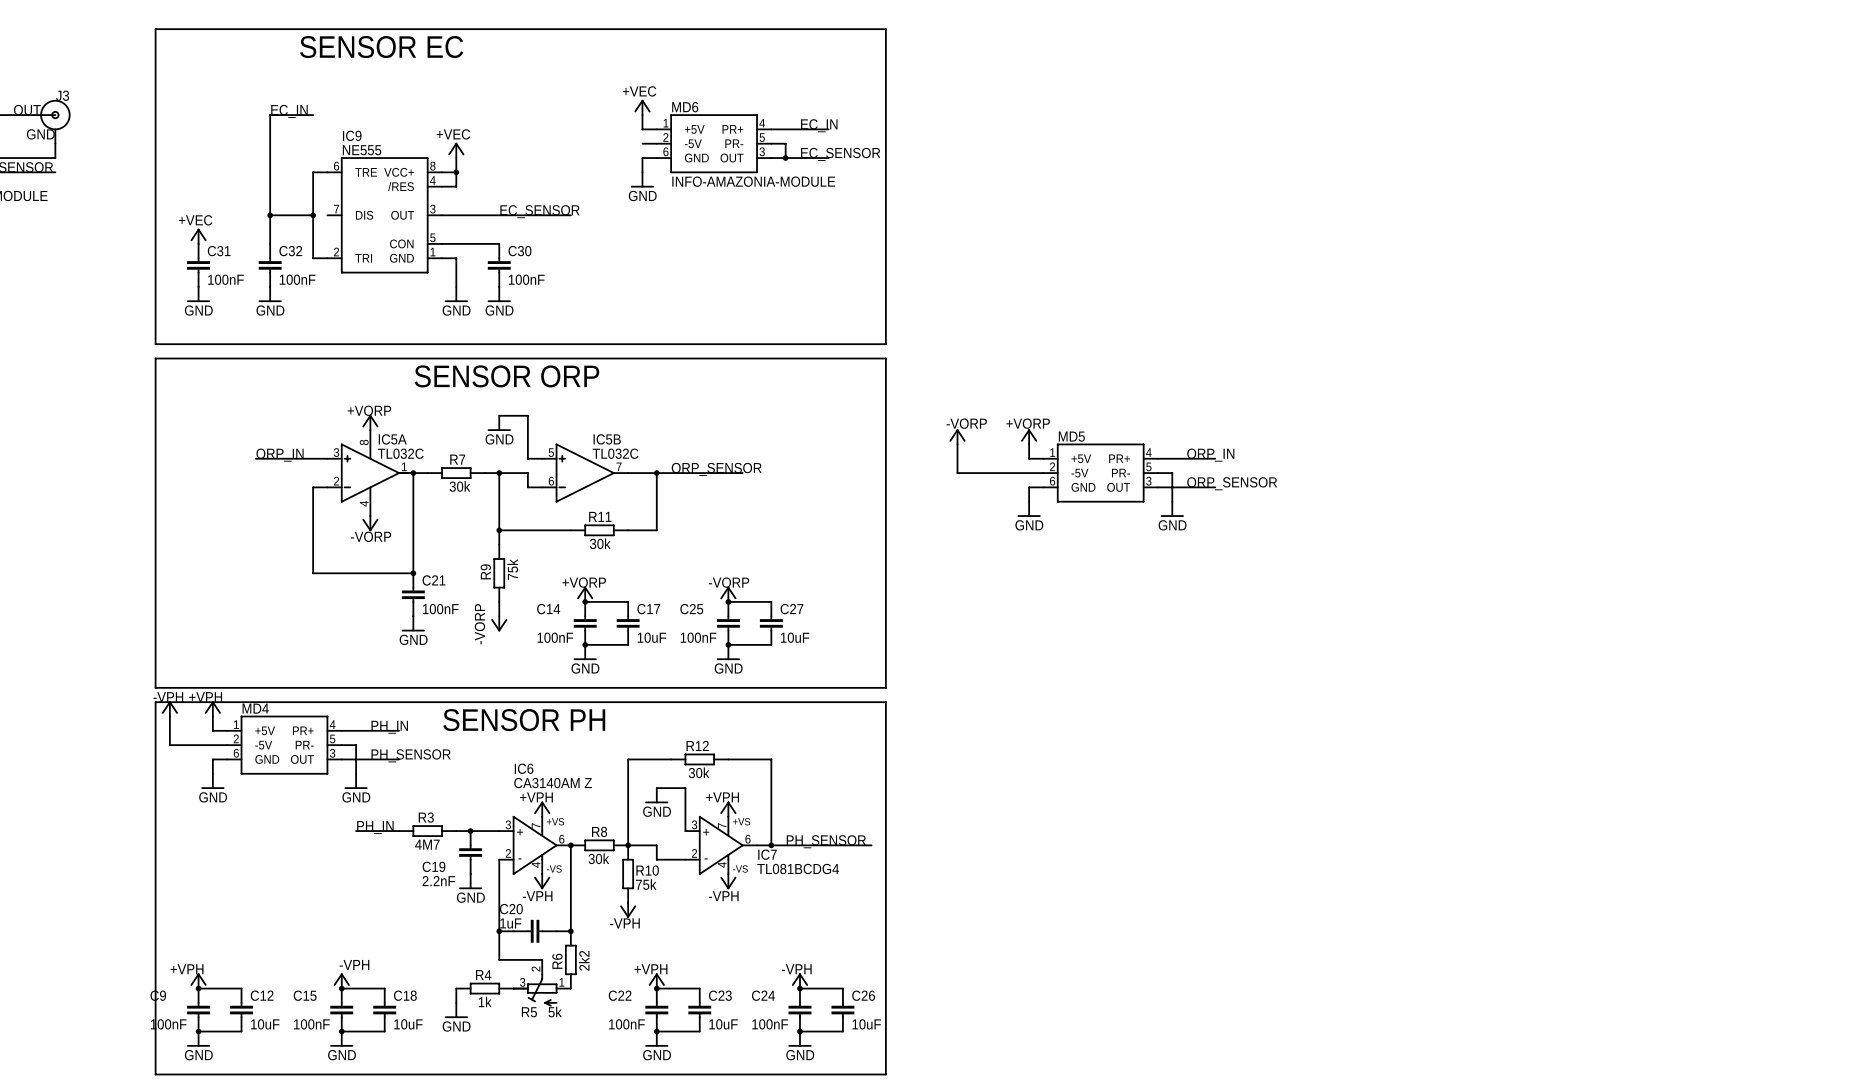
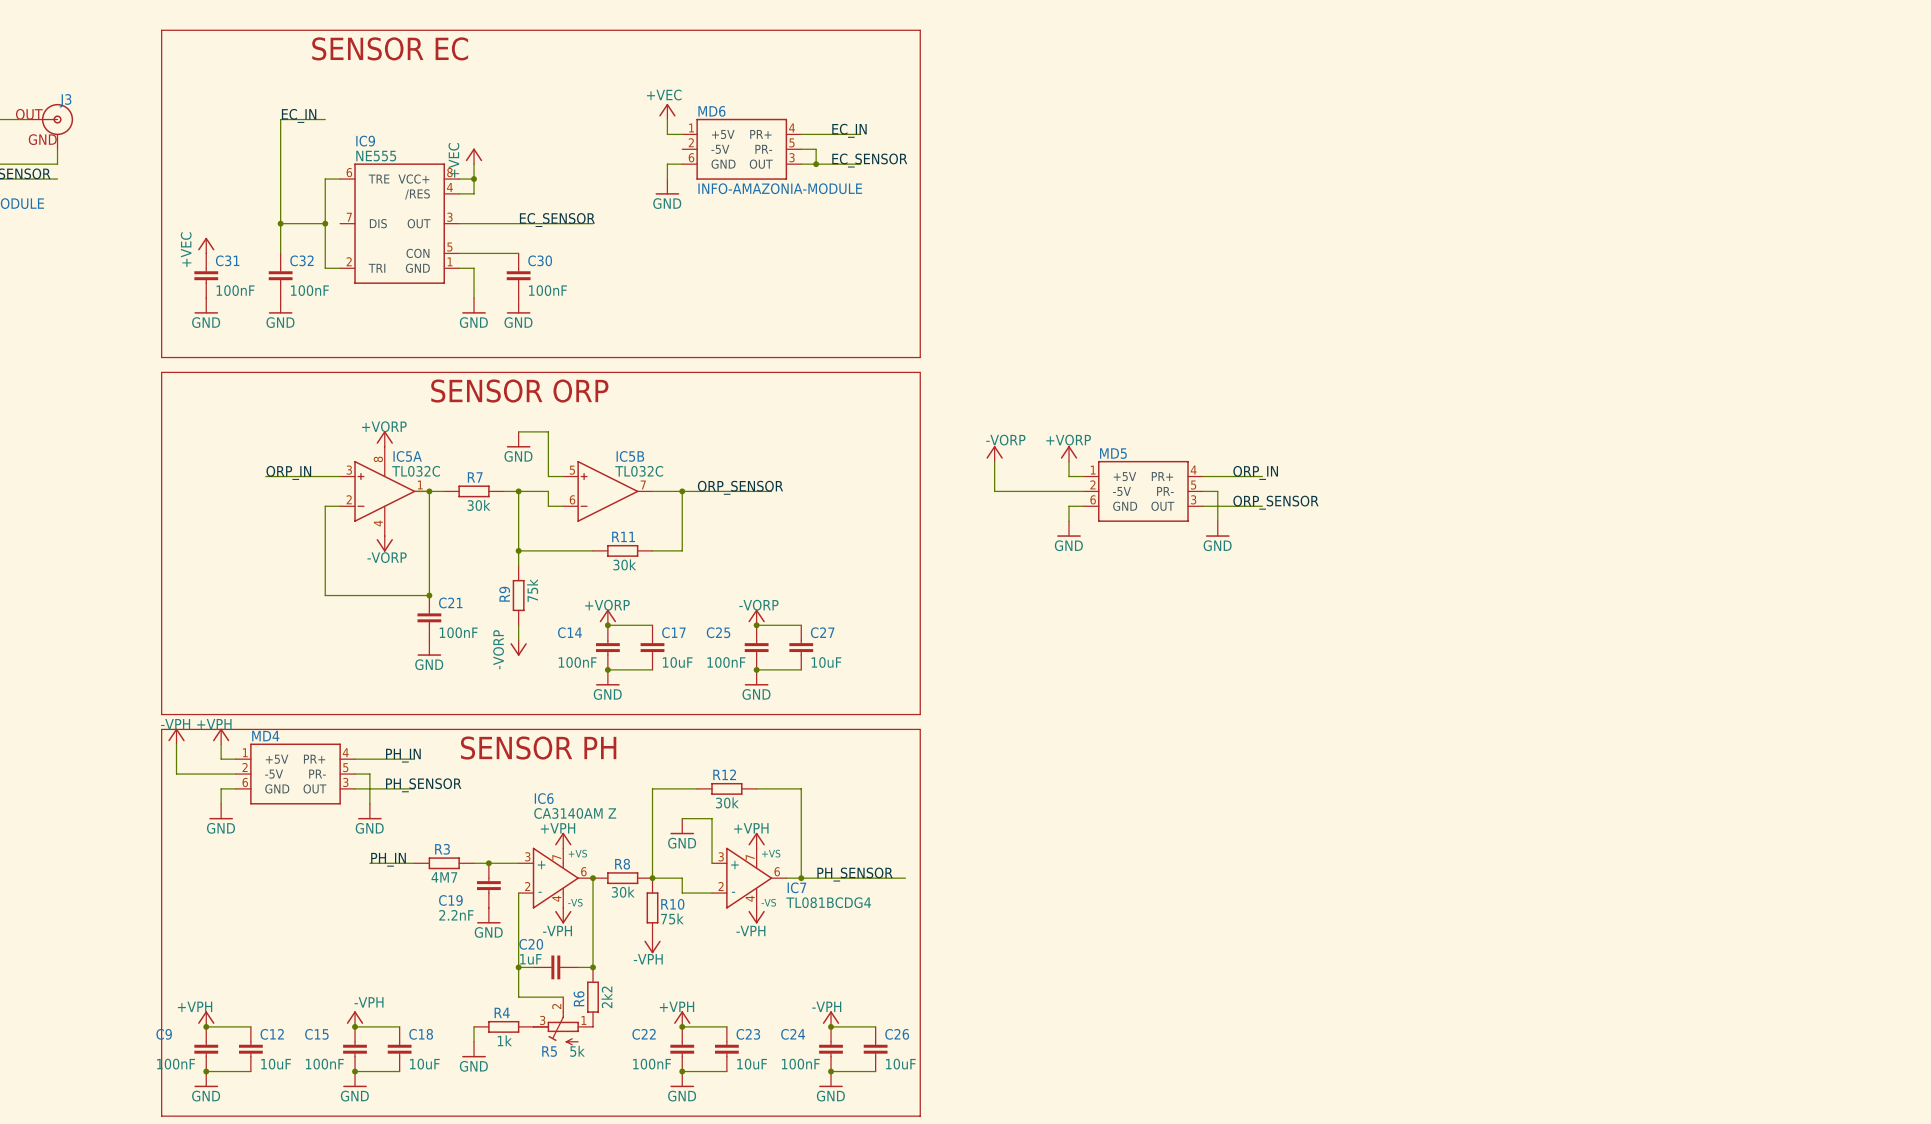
power symbol text rotation: 0° (453, 134) -> 90° counterclockwise (453, 160)
wire: (642, 143) (656, 143) -> none
power symbol text rotation: 0° (195, 220) -> 90° counterclockwise (186, 249)

